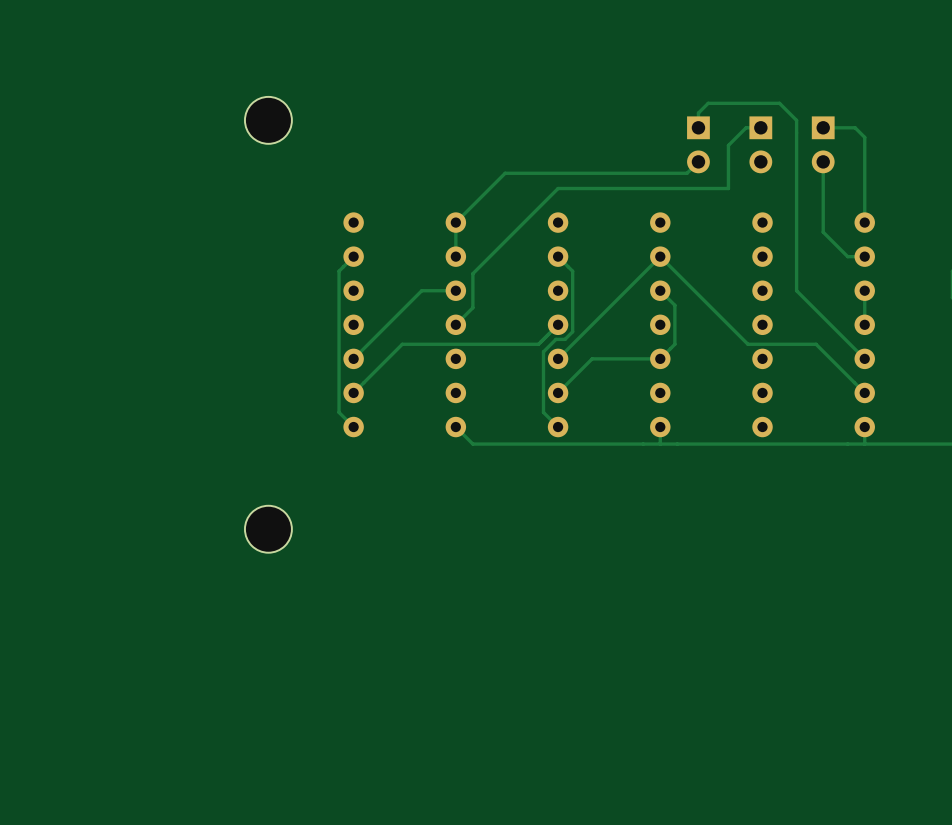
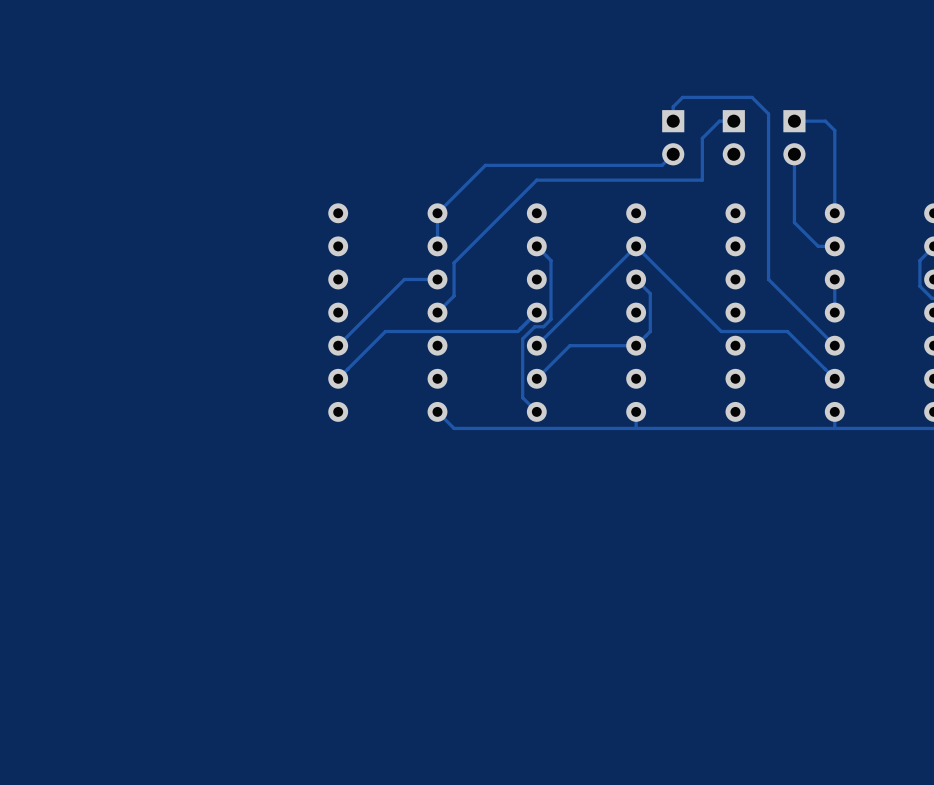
part: (268, 120) -> none
track: (353, 256) (339, 271) (339, 412) (353, 427) -> none
part: (268, 529) -> none

